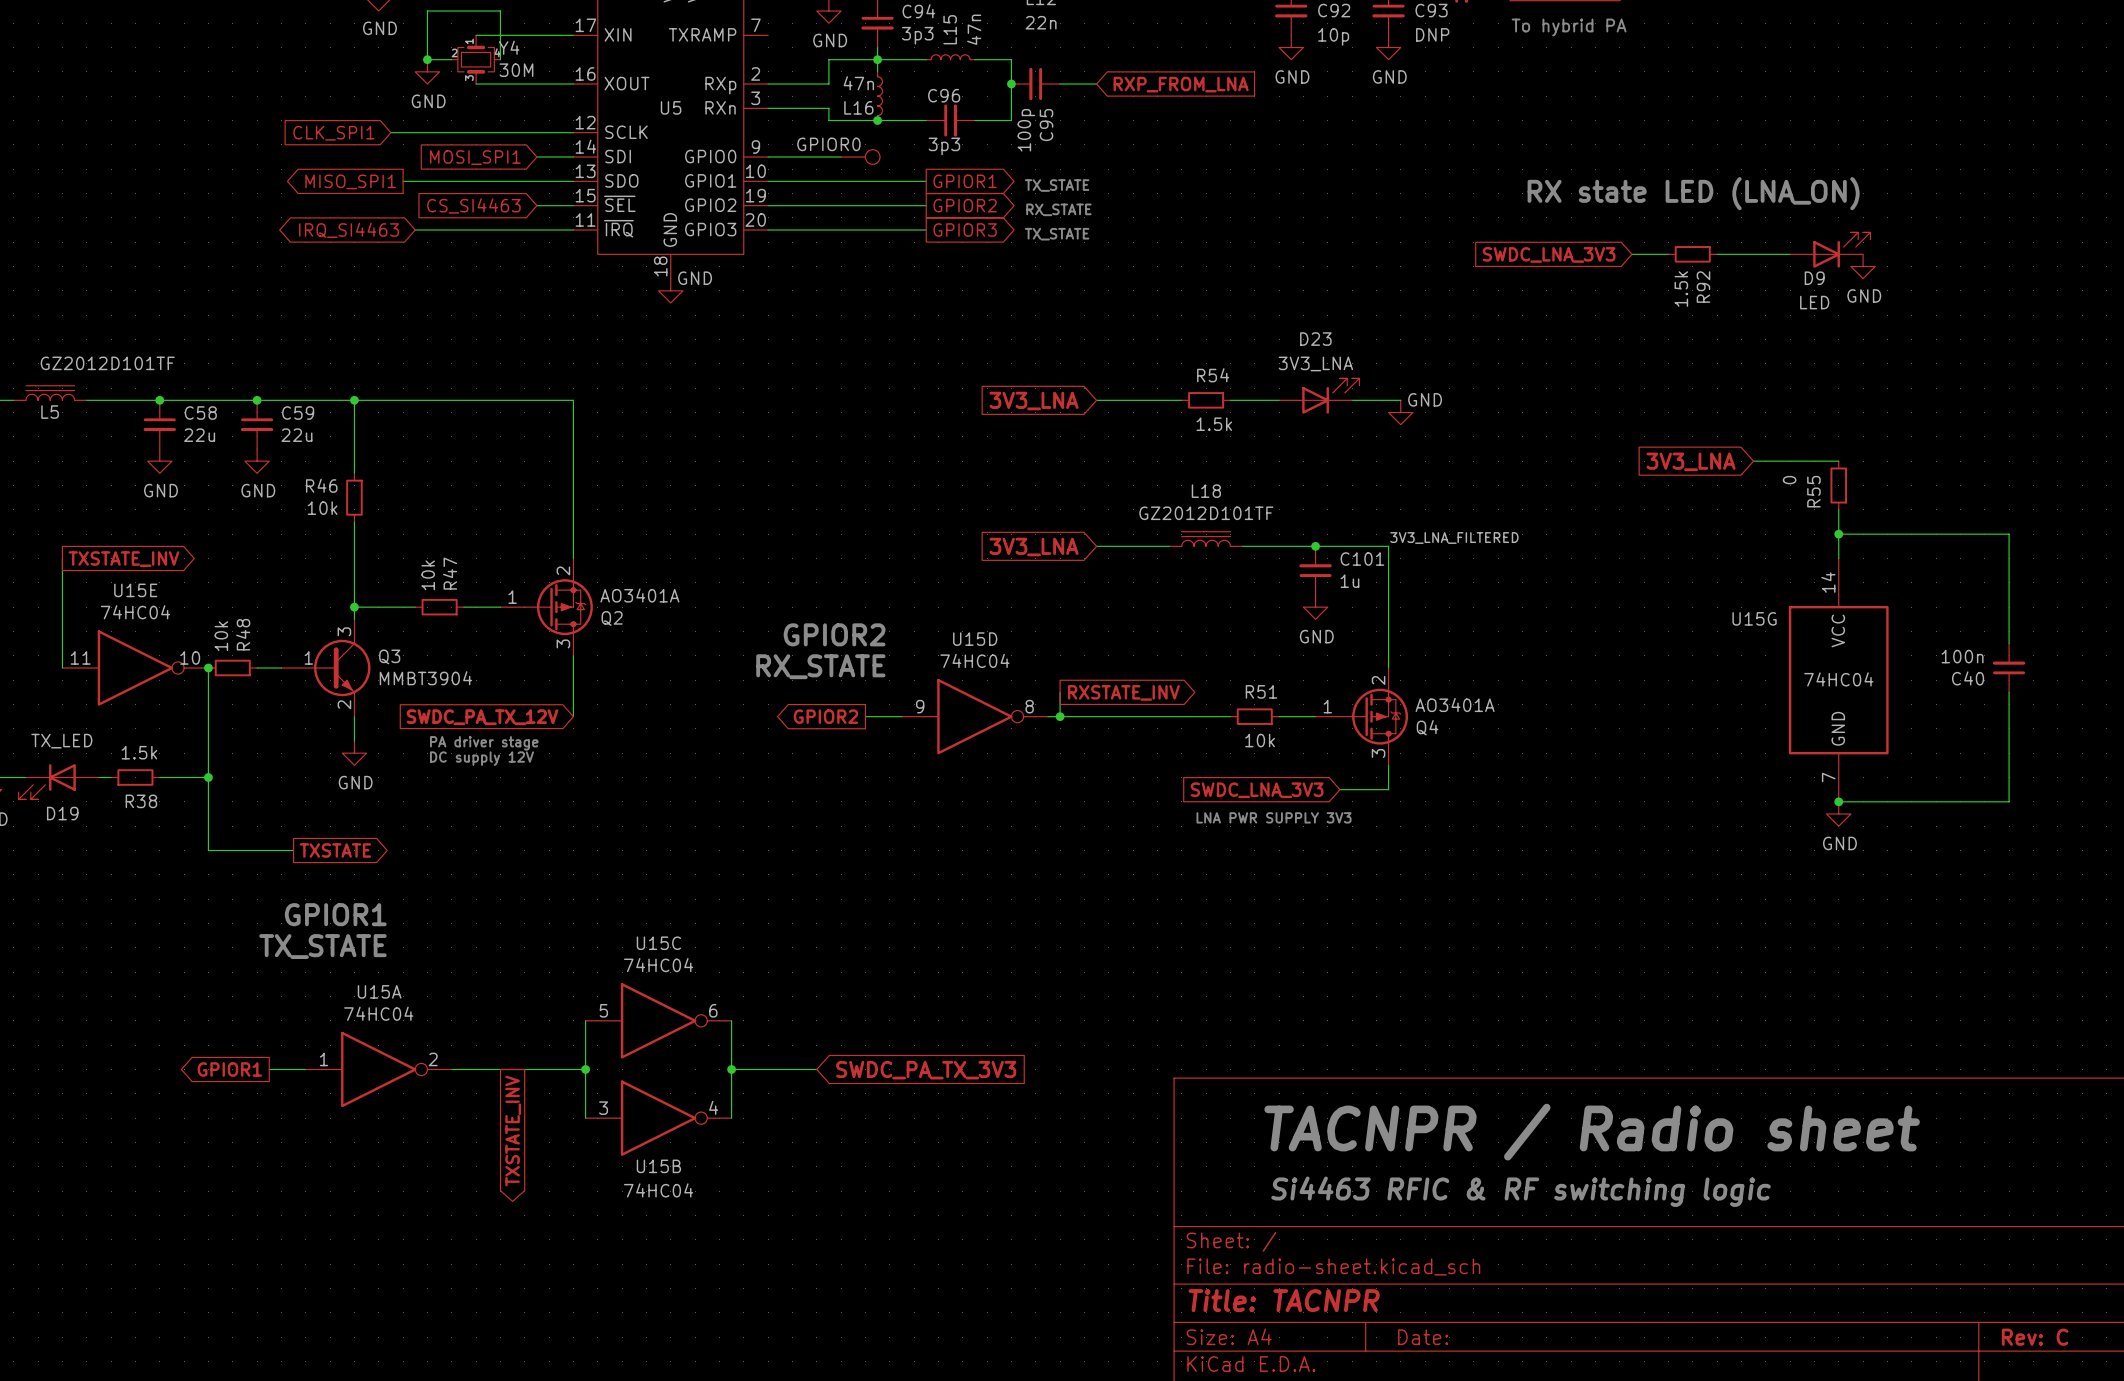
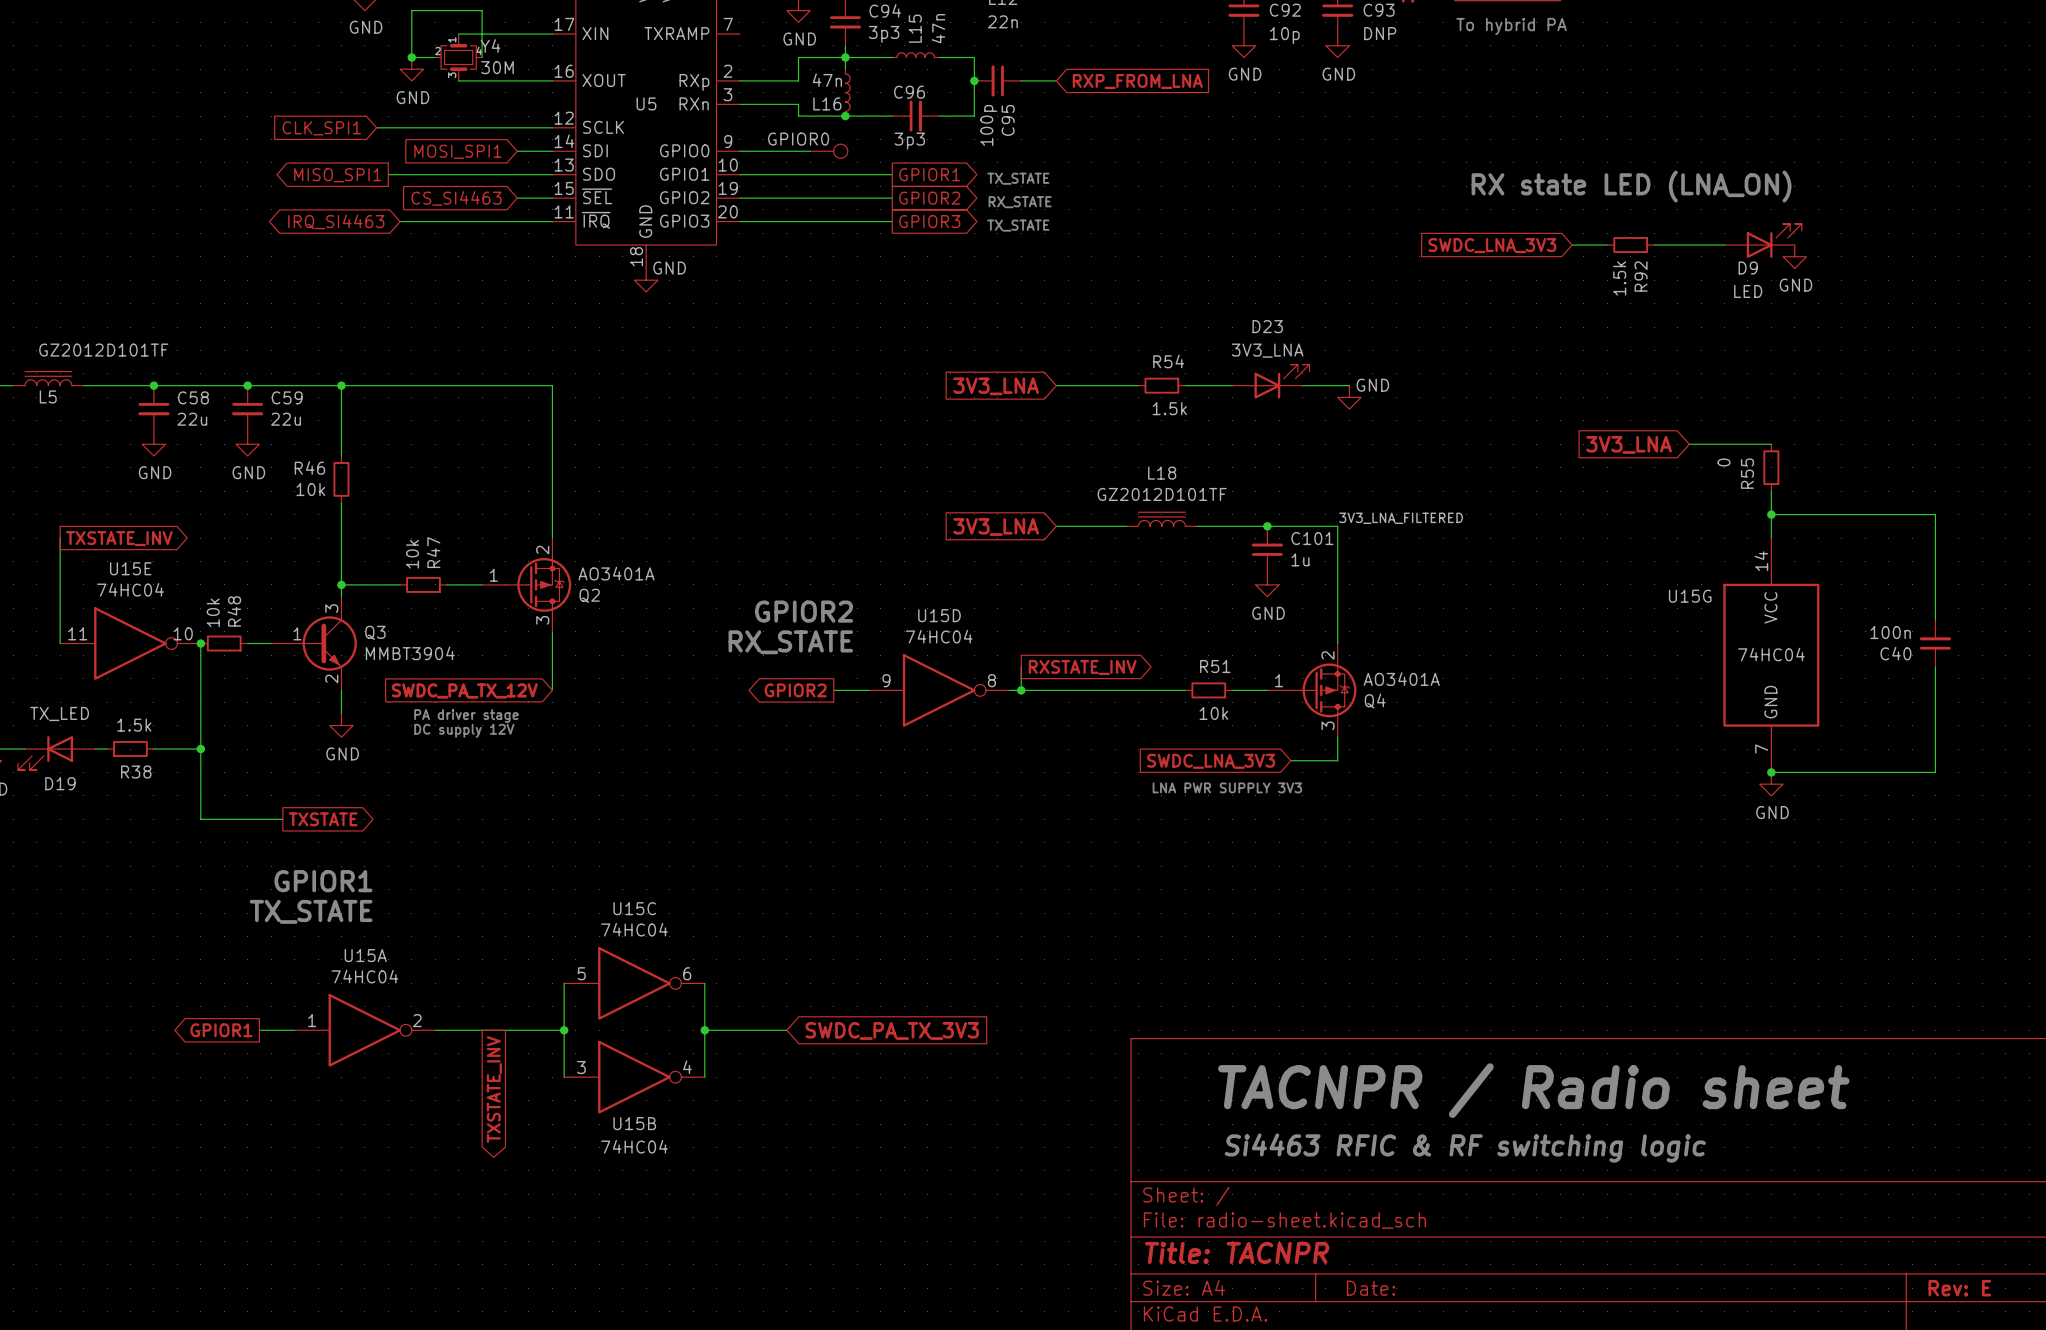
title block: Rev: C (2035, 1337) -> Rev: E (1959, 1288)

